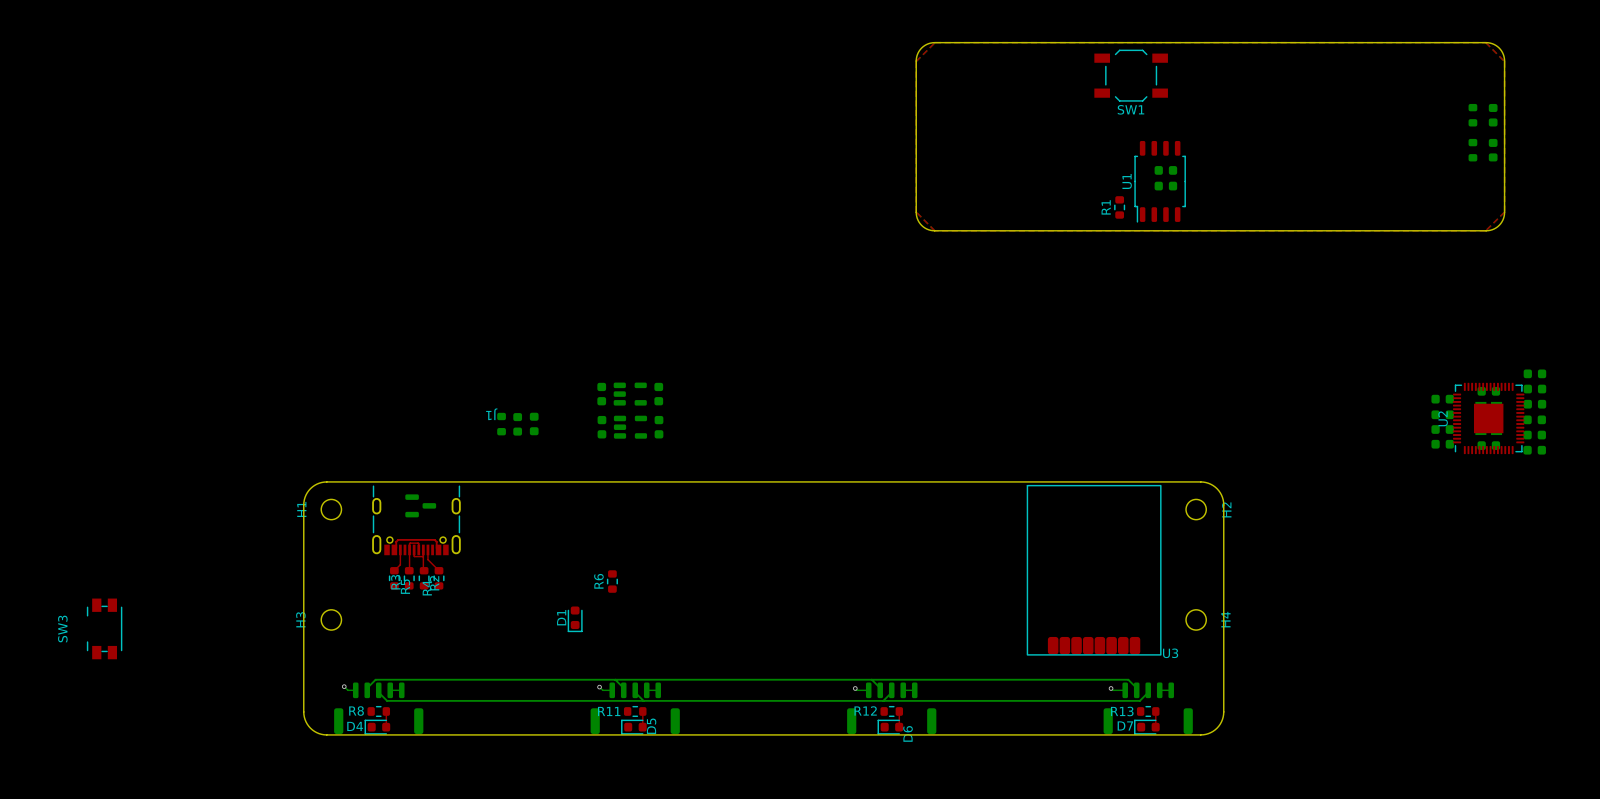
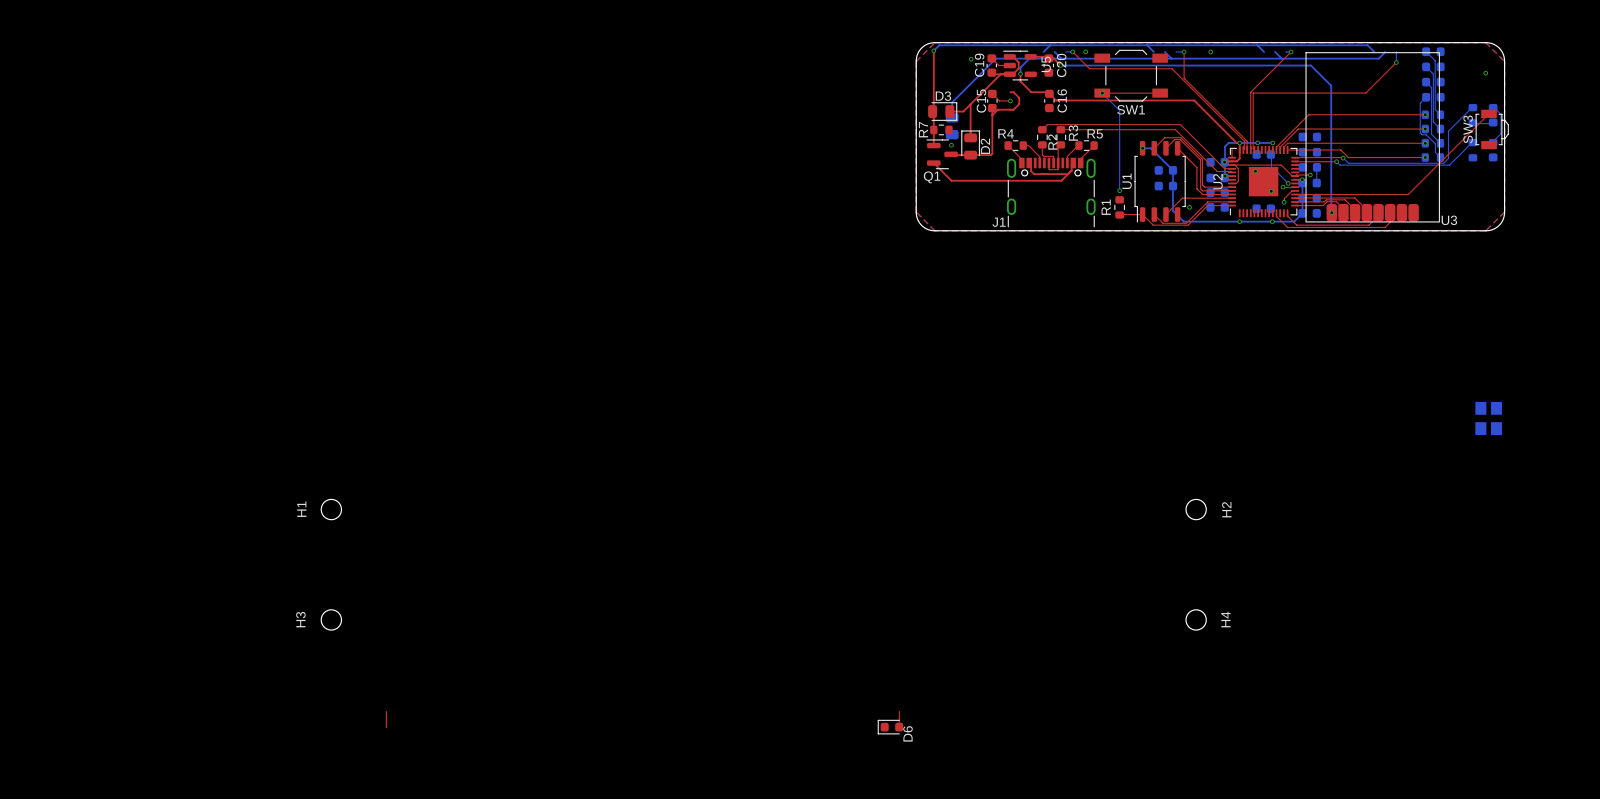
bottom track: none -> (1050, 45) (1043, 51)
bottom track: none -> (1147, 45) (1153, 51)
bottom track: none -> (1257, 45) (1264, 51)
bottom track: none -> (933, 50) (939, 45) (1367, 45) (1374, 51)
top track: none -> (933, 50) (933, 145)
via: none -> (933, 50)
bottom track: none -> (1054, 51) (1061, 58)
bottom track: none -> (1065, 51) (1072, 51)
top track: none -> (1072, 51) (1089, 68) (1171, 68) (1244, 141) (1243, 150)
via: none -> (1072, 51)
via: none -> (1085, 51)
bottom track: none -> (1164, 51) (1171, 58)
bottom track: none -> (1175, 51) (1184, 51)
top track: none -> (1184, 51) (1184, 78) (1247, 141) (1247, 150)
via: none -> (1184, 51)
bottom track: none -> (1275, 51) (1281, 58)
bottom track: none -> (1385, 51) (1378, 58) (995, 58) (952, 102) (952, 117)
bottom track: none -> (1396, 51) (1396, 62)
bottom track: none -> (1426, 51) (1435, 60) (1435, 109) (1440, 114)
part: none -> (1433, 51)
via: none -> (1210, 52)
bottom track: none -> (1286, 52) (1291, 52)
top track: none -> (1291, 52) (1250, 92) (1250, 150)
via: none -> (1291, 52)
top track: none -> (1009, 56) (1013, 56) (1018, 62) (1018, 68) (1013, 74) (991, 72)
top track: none -> (1030, 56) (1053, 58) (1060, 65)
top track: none -> (991, 58) (998, 65) (1009, 65)
bottom track: none -> (1029, 58) (1020, 67) (1020, 73)
via: none -> (971, 59)
top track: none -> (1396, 62) (1365, 93) (1253, 93) (1254, 150)
via: none -> (1396, 62)
C19: none -> (991, 65)
U5: none -> (1020, 65)
C20: none -> (1048, 65)
bottom track: none -> (1060, 65) (1311, 65) (1331, 85) (1331, 212)
via: none -> (1060, 65)
bottom track: none -> (1426, 66) (1433, 74) (1433, 121) (1440, 129)
part: none -> (1433, 66)
top track: none -> (1020, 73) (1020, 81) (1031, 92) (1047, 92) (1056, 100) (1194, 100) (1236, 142) (1239, 142) (1239, 158) (1236, 161) (1224, 162)
via: none -> (1020, 73)
via: none -> (1485, 73)
top track: none -> (1000, 74) (963, 111) (949, 111)
bottom track: none -> (1426, 82) (1431, 87) (1431, 134) (1440, 143)
part: none -> (1433, 82)
top track: none -> (1010, 92) (1013, 92) (1019, 97) (1019, 104) (1013, 109) (997, 109) (992, 115)
top track: none -> (992, 93) (999, 100) (1010, 100)
bottom track: none -> (1102, 93) (1119, 110) (1119, 190)
top track: none -> (1102, 93) (1160, 93)
via: none -> (1102, 93)
bottom track: none -> (1426, 97) (1420, 103) (1420, 132) (1426, 134) (1435, 143) (1435, 152) (1440, 157)
part: none -> (1433, 97)
C15: none -> (992, 100)
via: none -> (1010, 100)
C16: none -> (1049, 100)
top track: none -> (970, 104) (970, 137)
bottom track: none -> (1472, 106) (1448, 131) (1448, 158) (1443, 163) (1348, 163) (1342, 157)
bottom track: none -> (1493, 106) (1500, 114) (1500, 133) (1493, 141)
top track: none -> (992, 108) (992, 153) (951, 154)
D3: none -> (942, 111)
top track: none -> (1489, 113) (1408, 194) (1295, 194)
top track: none -> (1425, 114) (1308, 114) (1276, 147) (1276, 150)
via: none -> (1425, 114)
part: none -> (1432, 114)
bottom track: none -> (1472, 123) (1493, 123)
part: none -> (952, 126)
R7: none -> (941, 129)
top track: none -> (1042, 129) (1047, 124) (1180, 124) (1224, 168) (1232, 168)
top track: none -> (1060, 129) (1175, 129) (1217, 171) (1232, 172)
top track: none -> (1425, 129) (1298, 129) (1280, 147) (1280, 150)
via: none -> (1425, 129)
part: none -> (1432, 129)
part: none -> (1309, 137)
bottom track: none -> (1472, 141) (1449, 165) (1340, 165) (1336, 161)
via: none -> (1239, 142)
via: none -> (1257, 142)
bottom track: none -> (1272, 142) (1228, 142) (1224, 146) (1224, 176)
via: none -> (1272, 142)
top track: none -> (1425, 143) (1287, 143) (1283, 150)
via: none -> (1425, 143)
part: none -> (1432, 143)
top track: none -> (1042, 144) (1042, 154) (1044, 156) (1053, 156) (1053, 163)
top track: none -> (1060, 144) (1058, 147) (1058, 169) (1049, 169) (1048, 163)
via: none -> (951, 145)
D2: none -> (970, 145)
top track: none -> (1008, 145) (1021, 159) (1021, 163)
top track: none -> (1023, 145) (1028, 145) (1039, 156) (1039, 163)
top track: none -> (1078, 145) (1067, 156) (1067, 163)
top track: none -> (1094, 145) (1080, 158) (1080, 163)
bottom track: none -> (1142, 148) (1150, 148) (1173, 170) (1173, 210) (1183, 221) (1294, 221) (1302, 213) (1302, 179)
via: none -> (1142, 148)
top track: none -> (1154, 148) (1164, 137) (1180, 137) (1202, 159) (1202, 185) (1204, 187) (1232, 187)
top track: none -> (1165, 148) (1174, 139) (1180, 139) (1200, 160) (1200, 188) (1202, 190) (1232, 190)
top track: none -> (1177, 148) (1196, 167) (1196, 188) (1202, 194) (1232, 194)
top track: none -> (1232, 149) (1232, 157)
top track: none -> (1287, 150) (1340, 150) (1348, 157) (1425, 157)
part: none -> (1309, 152)
Q1: none -> (942, 154)
part: none -> (1263, 154)
bottom track: none -> (1270, 154) (1271, 171) (1276, 171) (1288, 183)
top track: none -> (1342, 157) (1295, 157)
via: none -> (1425, 157)
part: none -> (1432, 157)
via: none -> (1343, 158)
top track: none -> (1295, 161) (1336, 161)
via: none -> (1336, 161)
part: none -> (1217, 162)
via: none -> (1224, 162)
top track: none -> (1029, 163) (1031, 171) (1034, 174) (1068, 174)
top track: none -> (1073, 163) (1071, 170) (1061, 180) (951, 180) (933, 163)
top track: none -> (1232, 165) (1281, 165) (1292, 176) (1310, 175)
top track: none -> (1234, 165) (1238, 168) (1238, 181) (1232, 183)
part: none -> (1309, 167)
bottom track: none -> (1316, 167) (1316, 183)
via: none -> (1255, 171)
via: none -> (1310, 175)
via: none -> (1224, 176)
part: none -> (1217, 177)
via: none -> (1302, 179)
via: none -> (1288, 183)
part: none -> (1309, 183)
top track: none -> (1283, 187) (1295, 187)
via: none -> (1283, 187)
via: none -> (1119, 190)
top track: none -> (1295, 190) (1292, 190) (1284, 198) (1284, 202)
via: none -> (1271, 191)
part: none -> (1217, 192)
top track: none -> (1232, 198) (1182, 198) (1165, 214)
top track: none -> (1295, 198) (1354, 198) (1366, 209) (1366, 212)
part: none -> (1309, 198)
top track: none -> (1232, 201) (1207, 201) (1186, 223) (1163, 223) (1154, 214)
top track: none -> (1295, 201) (1345, 199) (1355, 209) (1355, 212)
via: none -> (1284, 202)
top track: none -> (1232, 205) (1207, 205) (1188, 225) (1153, 225) (1142, 214)
top track: none -> (1295, 205) (1323, 205) (1327, 201) (1336, 201) (1343, 208) (1343, 212)
via: none -> (1189, 207)
part: none -> (1217, 207)
part: none -> (1263, 208)
via: none -> (1331, 212)
top track: none -> (1378, 212) (1378, 215) (1368, 225) (1296, 225) (1287, 215) (1287, 213)
top track: none -> (1390, 212) (1390, 222) (1385, 227) (1287, 227) (1276, 216) (1276, 213)
part: none -> (1309, 213)
top track: none -> (1142, 214) (1119, 215)
via: none -> (1239, 221)
via: none -> (1272, 221)
part: (1534, 373) -> none
part: (1534, 389) -> none
part: (1488, 391) -> none
part: (601, 394) -> none
part: (630, 394) -> none
part: (658, 394) -> none
part: (1442, 399) -> none
part: (1534, 404) -> none
J1 name position: J1 (491, 414) -> J1 (999, 222)
part: (1442, 414) -> none
U2 position: (1488, 418) -> (1263, 181)
part: (1534, 419) -> none
part: (534, 423) -> none
part: (501, 424) -> none
part: (517, 424) -> none
part: (601, 427) -> none
part: (630, 427) -> none
part: (658, 427) -> none
part: (1442, 429) -> none
part: (1534, 435) -> none
part: (1442, 444) -> none
part: (1488, 445) -> none
part: (1534, 450) -> none
board edge: (326, 481) (1205, 482) (1218, 490) (1223, 502) (1223, 717) (1215, 729) (1200, 734) (321, 734) (310, 728) (303, 714) (303, 504) (306, 494) (310, 488) (316, 484) (326, 481) -> none
part: (420, 505) -> none
J1 rotation: 0° (416, 520) -> 180° (1051, 192)
J1 position: (416, 520) -> (1051, 192)
top track: (394, 549) (398, 539) (434, 539) (438, 549) -> none
top track: (400, 549) (400, 564) (394, 570) -> none
top track: (414, 549) (414, 556) (423, 556) -> none
top track: (418, 549) (418, 543) (409, 543) (409, 570) -> none
top track: (423, 549) (424, 570) -> none
top track: (427, 549) (427, 559) (439, 570) -> none
U3 position: (1094, 570) -> (1372, 137)
R5 rotation: 0° (394, 578) -> 90° clockwise (1086, 145)
R5 position: (394, 578) -> (1086, 145)
R3 position: (409, 578) -> (1060, 137)
R2 position: (424, 578) -> (1042, 137)
R4 rotation: 0° (439, 578) -> 90° clockwise (1015, 145)
R4 position: (439, 578) -> (1015, 145)
R6: (612, 581) -> none
R3 name position: R3 (395, 582) -> R3 (1073, 133)
R5 name position: R5 (405, 586) -> R5 (1095, 133)
SW3 footprint: [87, 598, 123, 660] -> [1475, 109, 1509, 150]
D1: (575, 619) -> none
bottom track: (615, 679) (623, 690) -> none
bottom track: (871, 679) (880, 690) -> none
bottom track: (344, 686) (347, 690) (355, 690) -> none
via: (344, 686) -> none
bottom track: (599, 687) (602, 690) (612, 690) -> none
via: (599, 687) -> none
bottom track: (855, 688) (857, 690) (868, 690) -> none
via: (855, 688) -> none
bottom track: (1111, 688) (1112, 690) (1125, 690) -> none
via: (1111, 688) -> none
bottom track: (367, 690) (375, 679) (1128, 679) (1136, 690) -> none
bottom track: (378, 690) (387, 700) (1139, 700) (1148, 690) -> none
bottom track: (390, 690) (401, 690) -> none
bottom track: (635, 690) (643, 700) -> none
bottom track: (646, 690) (658, 690) -> none
bottom track: (891, 690) (883, 700) -> none
bottom track: (903, 690) (914, 690) -> none
bottom track: (1159, 690) (1171, 690) -> none
part: (378, 708) -> none
part: (635, 708) -> none
part: (891, 708) -> none
part: (1148, 708) -> none
R8: (378, 711) -> none
R11: (635, 711) -> none
top track: (642, 711) (642, 727) -> none
R12: (891, 711) -> none
R13: (1148, 711) -> none
top track: (1155, 711) (1155, 727) -> none
D4: (377, 727) -> none
D5: (633, 727) -> none
D7: (1146, 727) -> none

